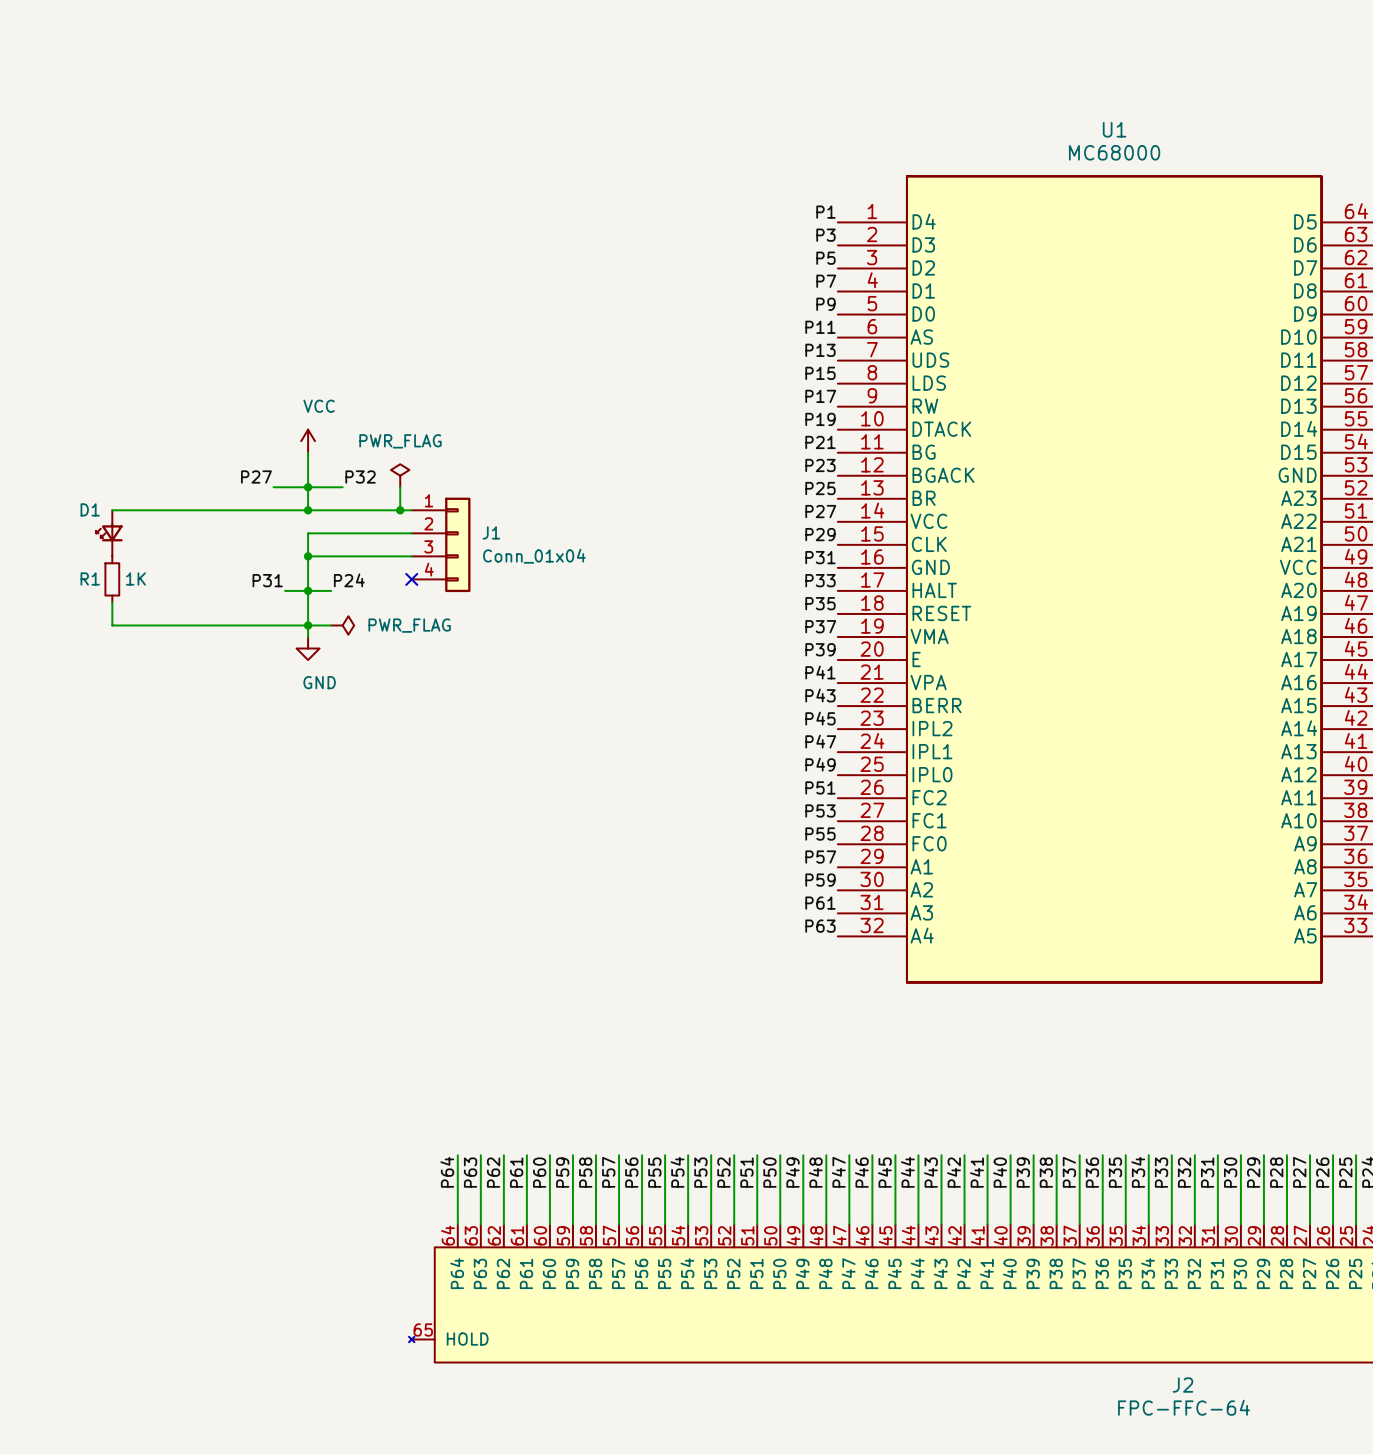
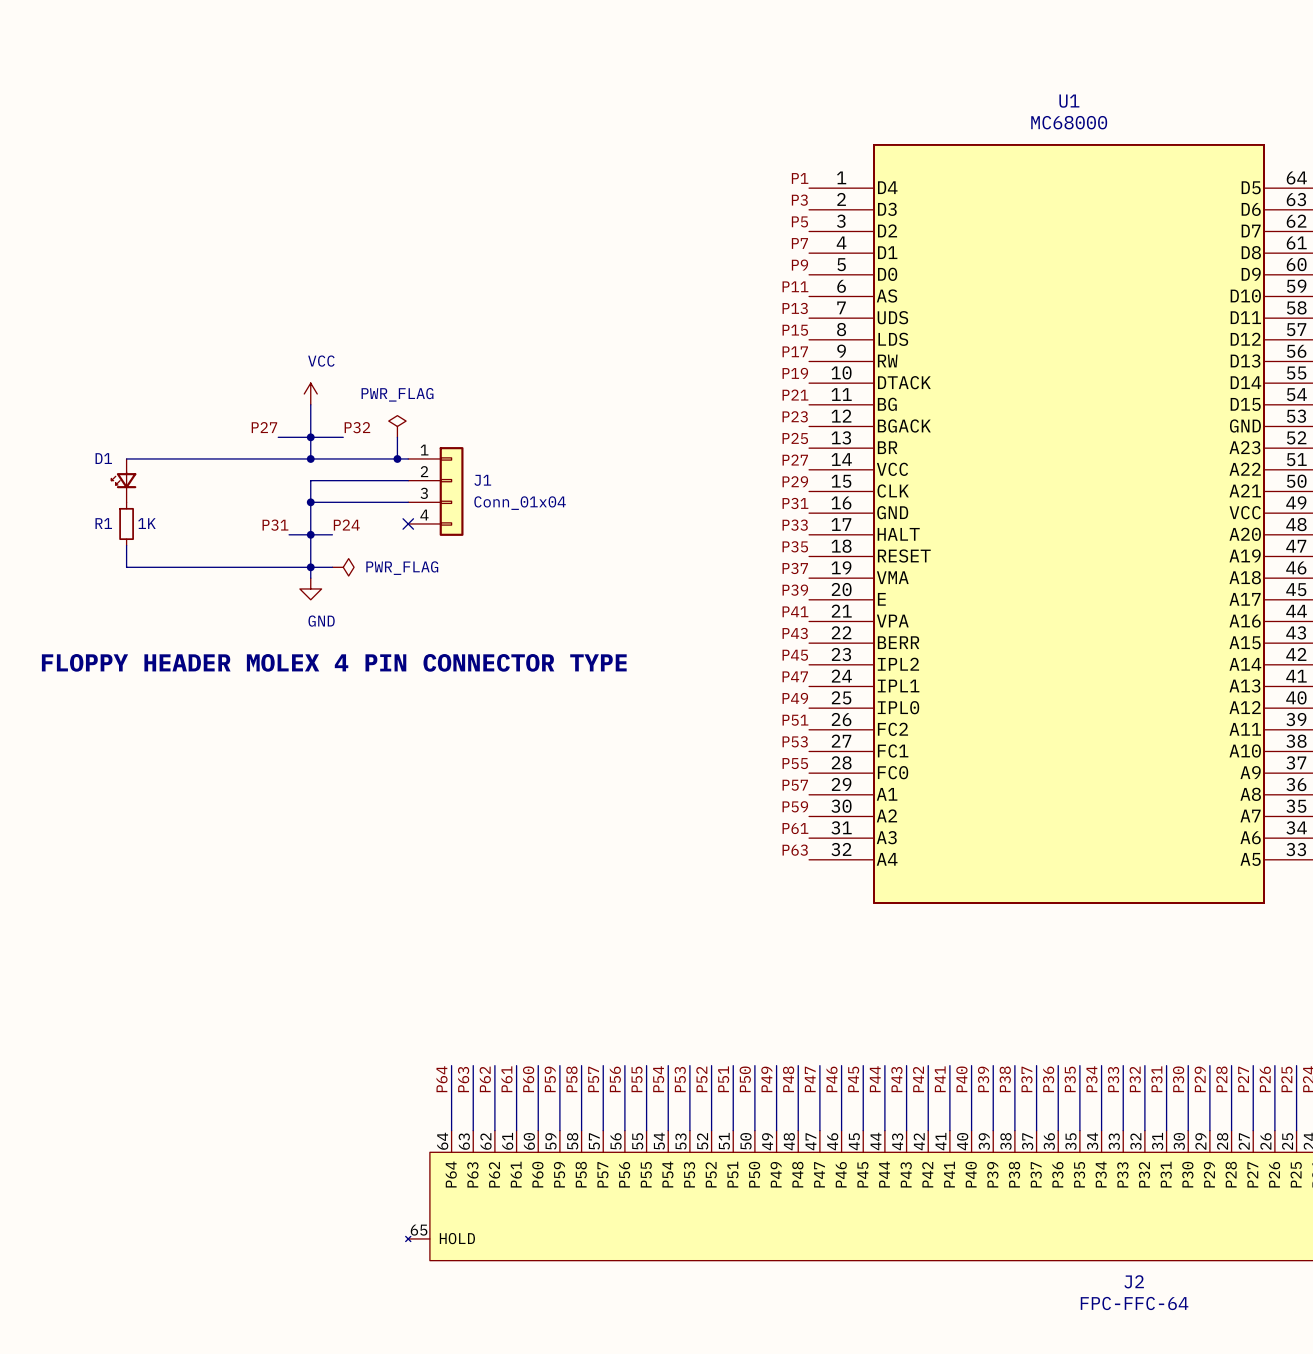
text: none -> FLOPPY HEADER MOLEX 4 PIN CONNECTOR TYPE (334, 662)

